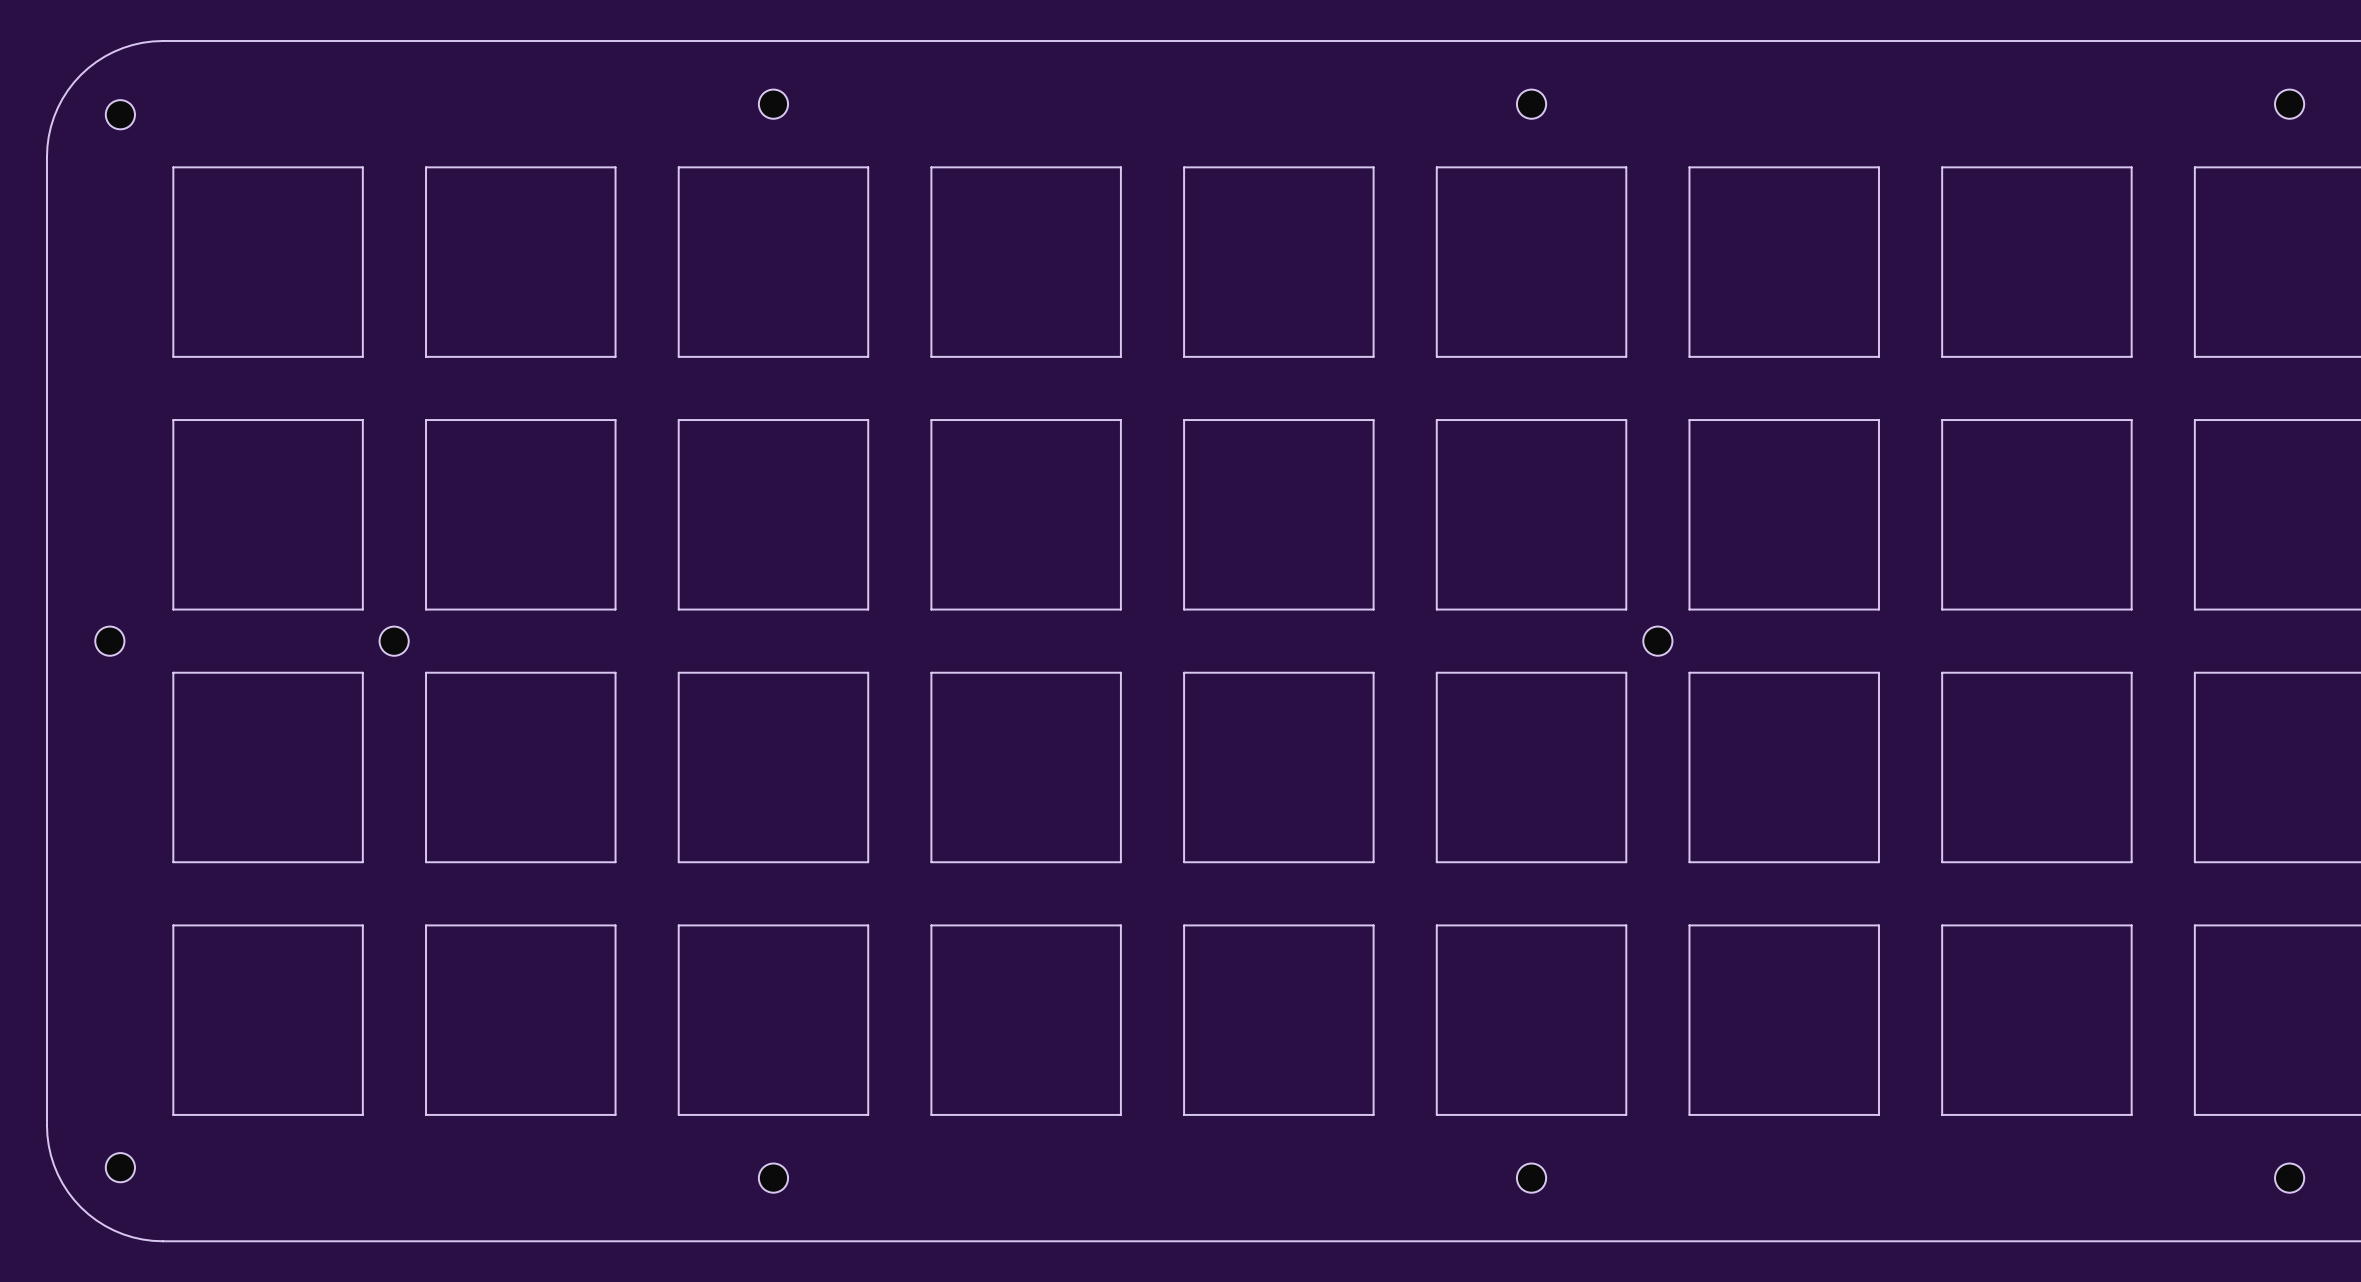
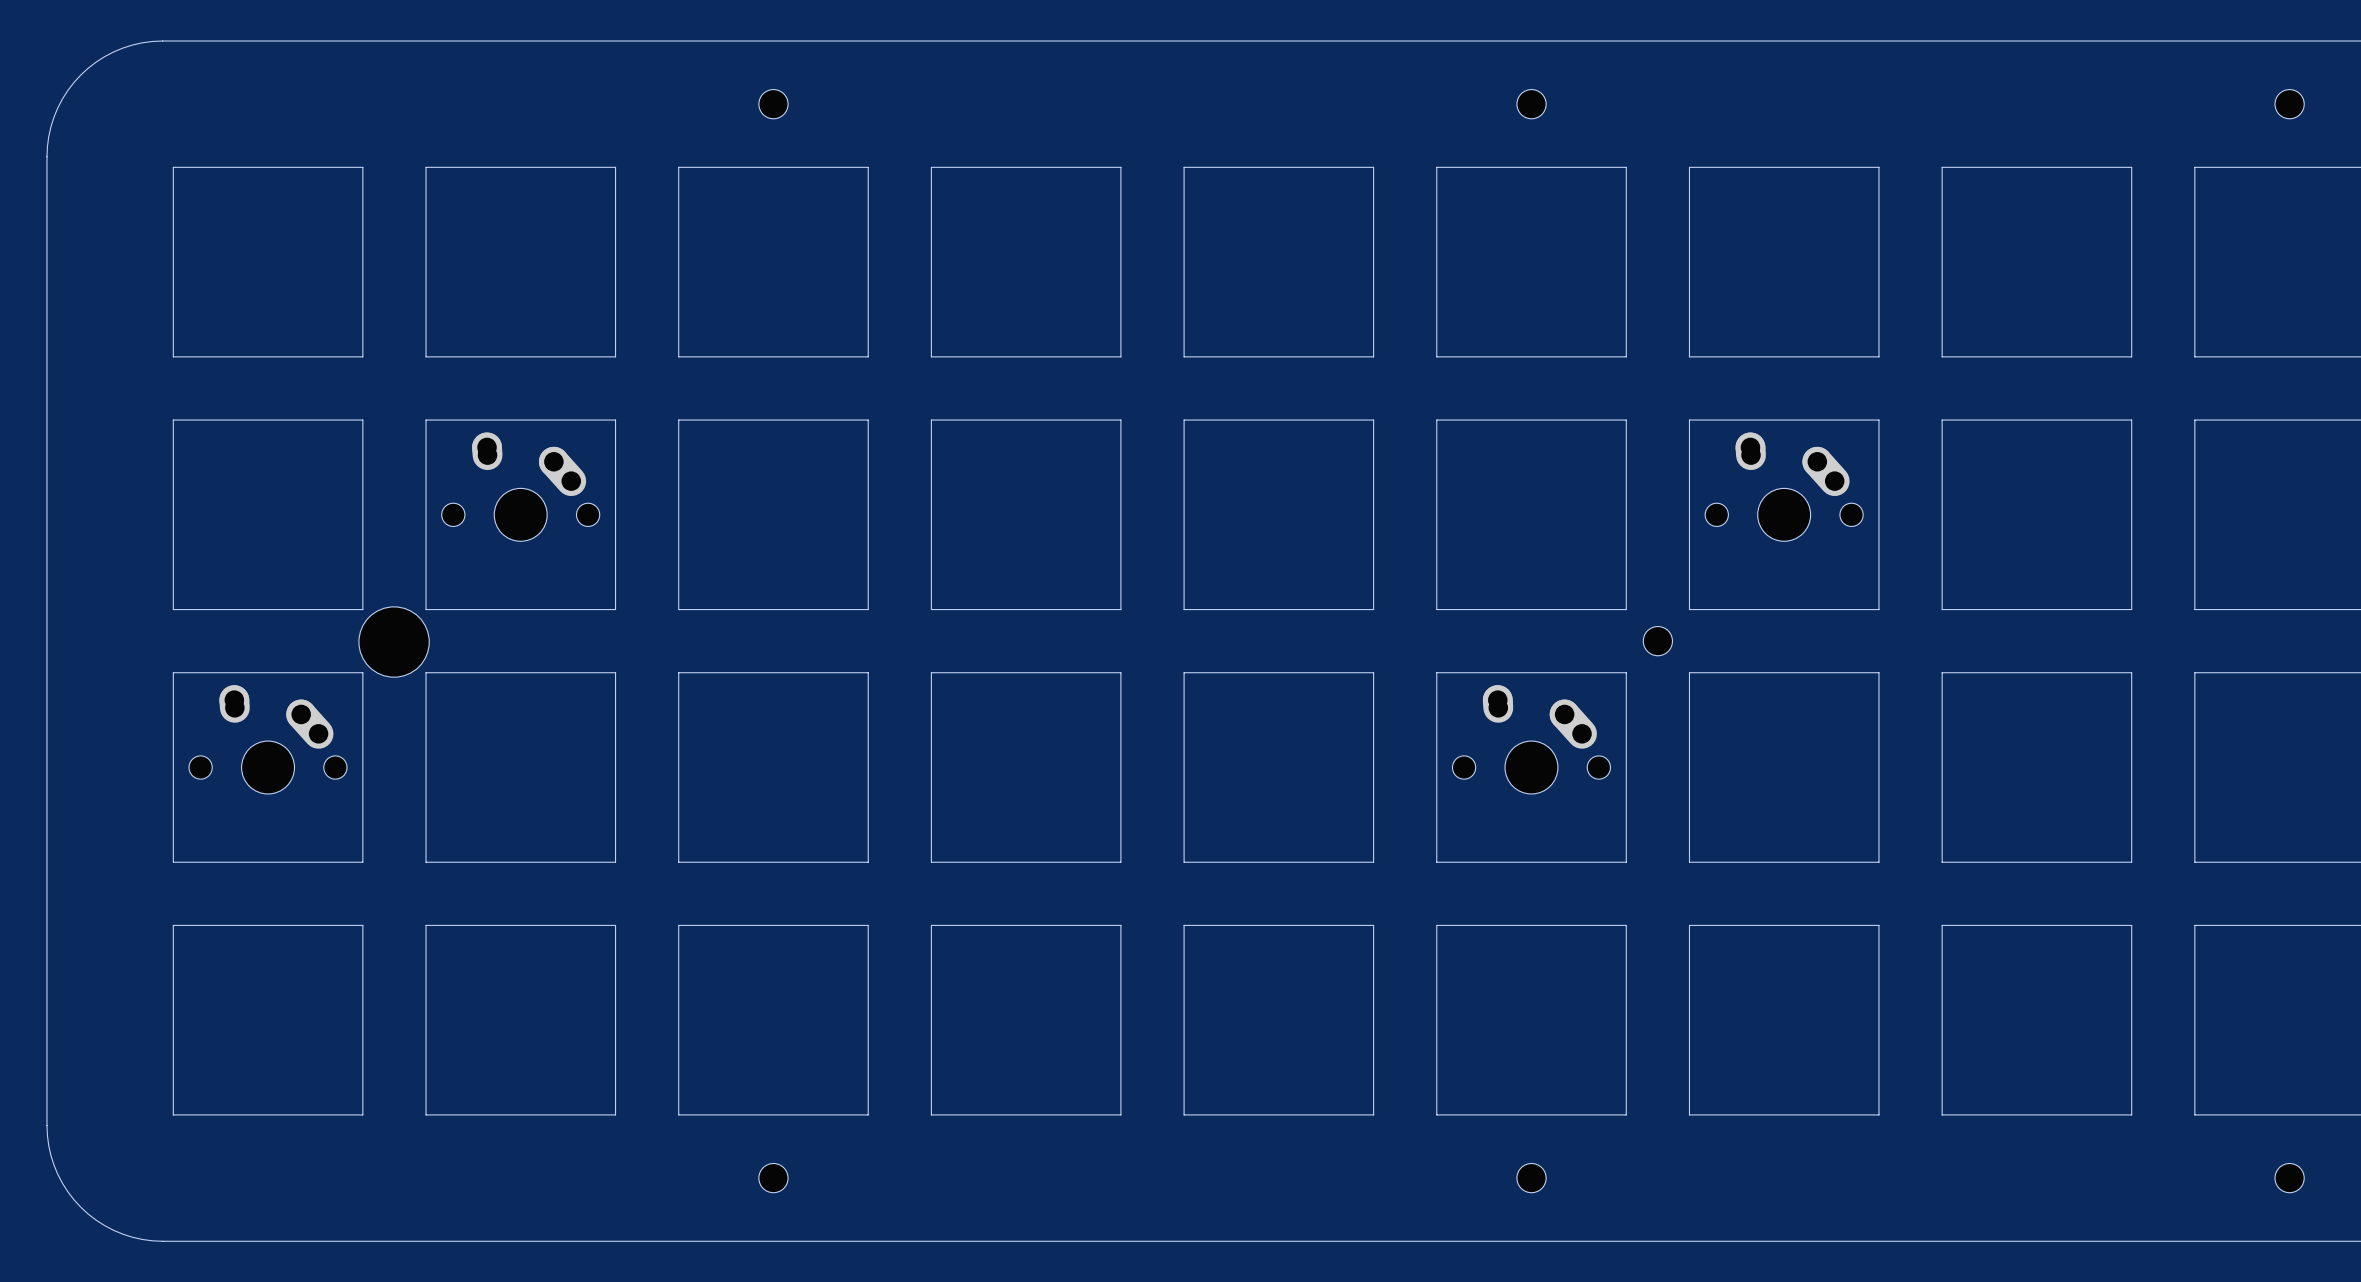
part: (120, 114) -> none
part: none -> (520, 486)
part: none -> (1784, 486)
part footprint: [379, 626, 409, 656] -> [358, 606, 430, 678]
part: (109, 641) -> none
part: none -> (268, 739)
part: none -> (1531, 739)
part: (120, 1167) -> none

